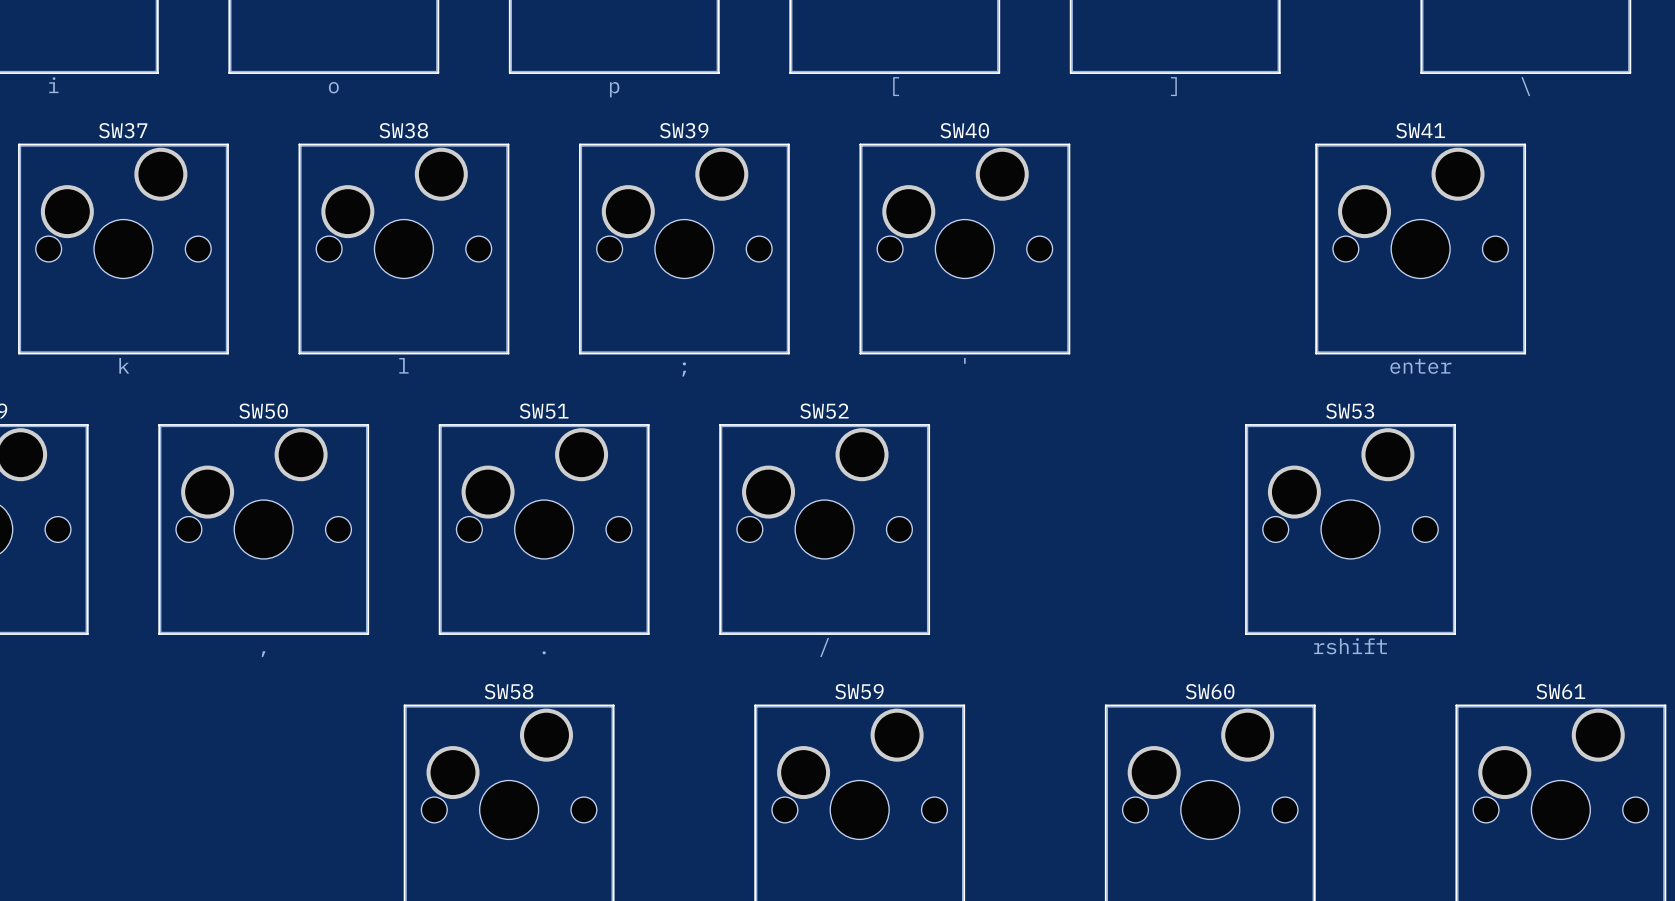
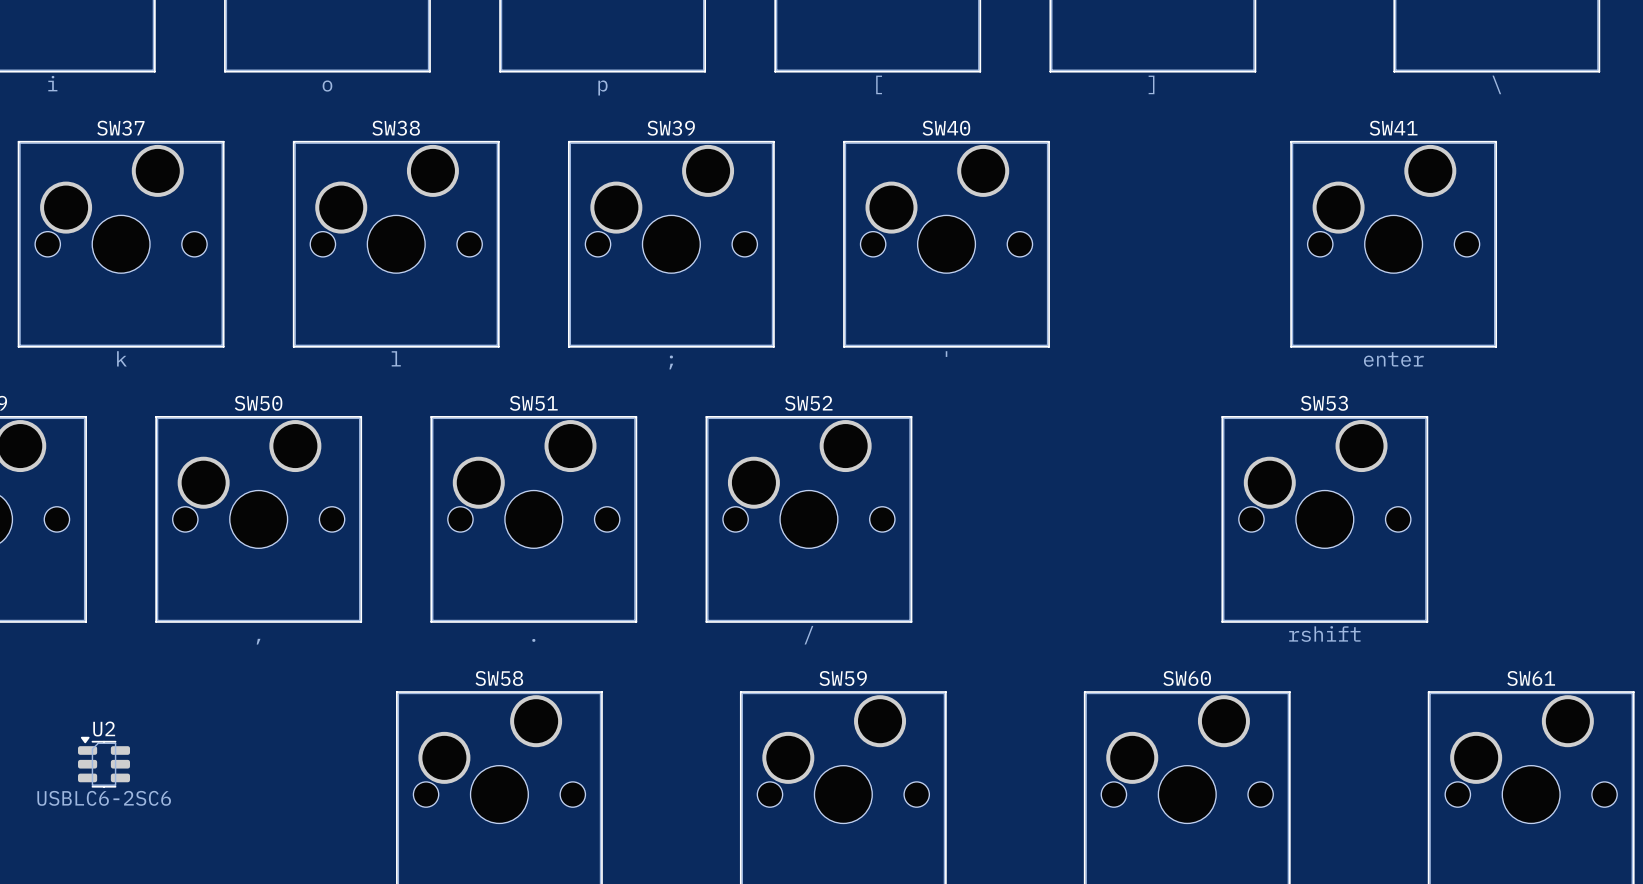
U2: none -> USBLC6-2SC6 (104, 762)

